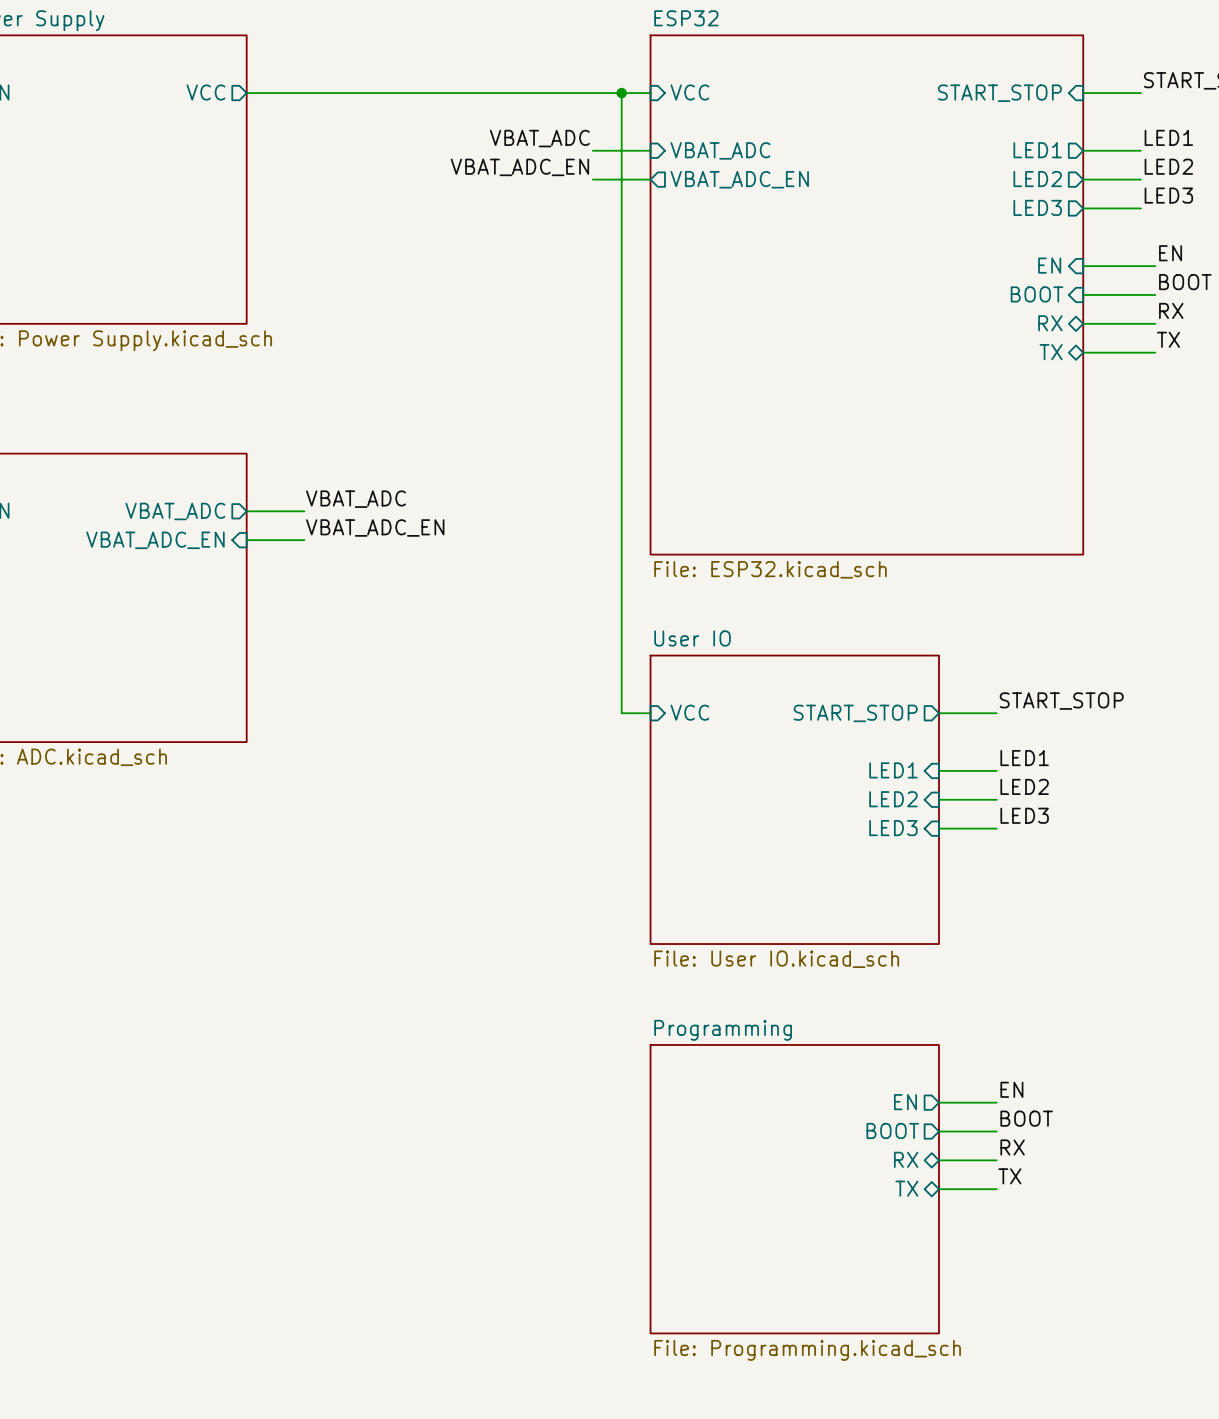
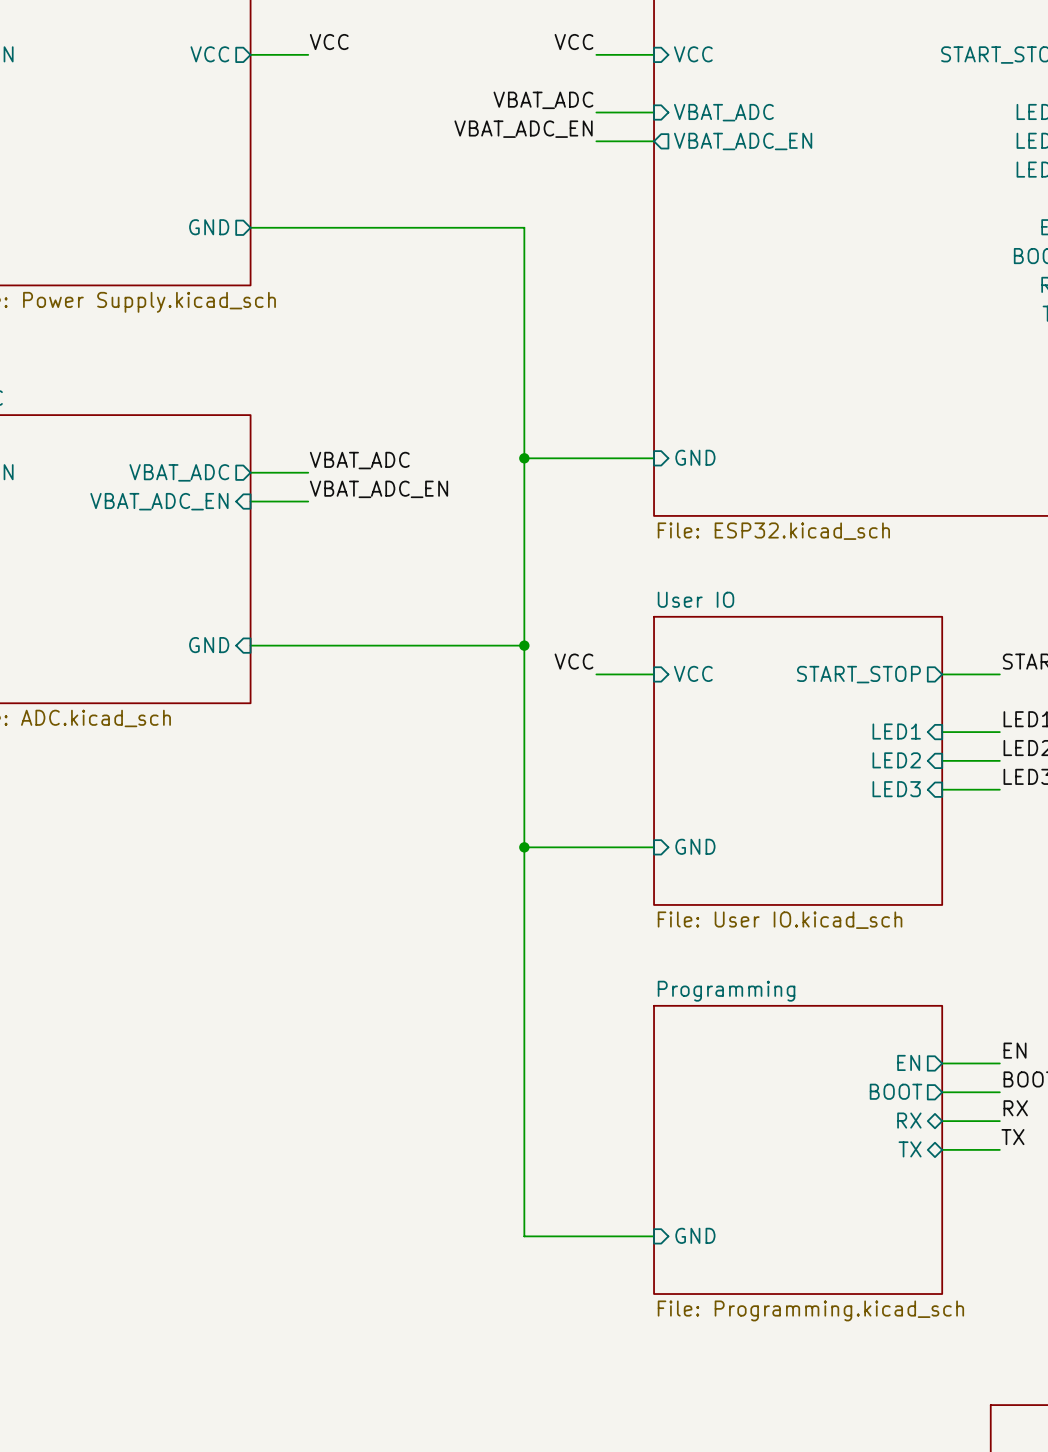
label: none -> VCC (329, 42)
label: none -> VCC (573, 42)
wire: (304, 93) (592, 93) -> none
wire: (621, 93) (621, 713) -> (596, 674) (625, 674)
junction: (621, 93) -> none
sheet pin: none -> GND (209, 227)
wire: none -> (250, 227) (524, 227) (524, 1236) (654, 1236)
wire: none -> (524, 458) (654, 458)
junction: none -> (524, 458)
sheet pin: none -> GND (695, 457)
sheet pin: none -> GND (209, 645)
wire: none -> (250, 645) (524, 645)
junction: none -> (524, 645)
label: none -> VCC (573, 661)
sheet pin: none -> GND (695, 846)
wire: none -> (524, 847) (654, 847)
junction: none -> (524, 847)
sheet pin: none -> GND (695, 1235)

